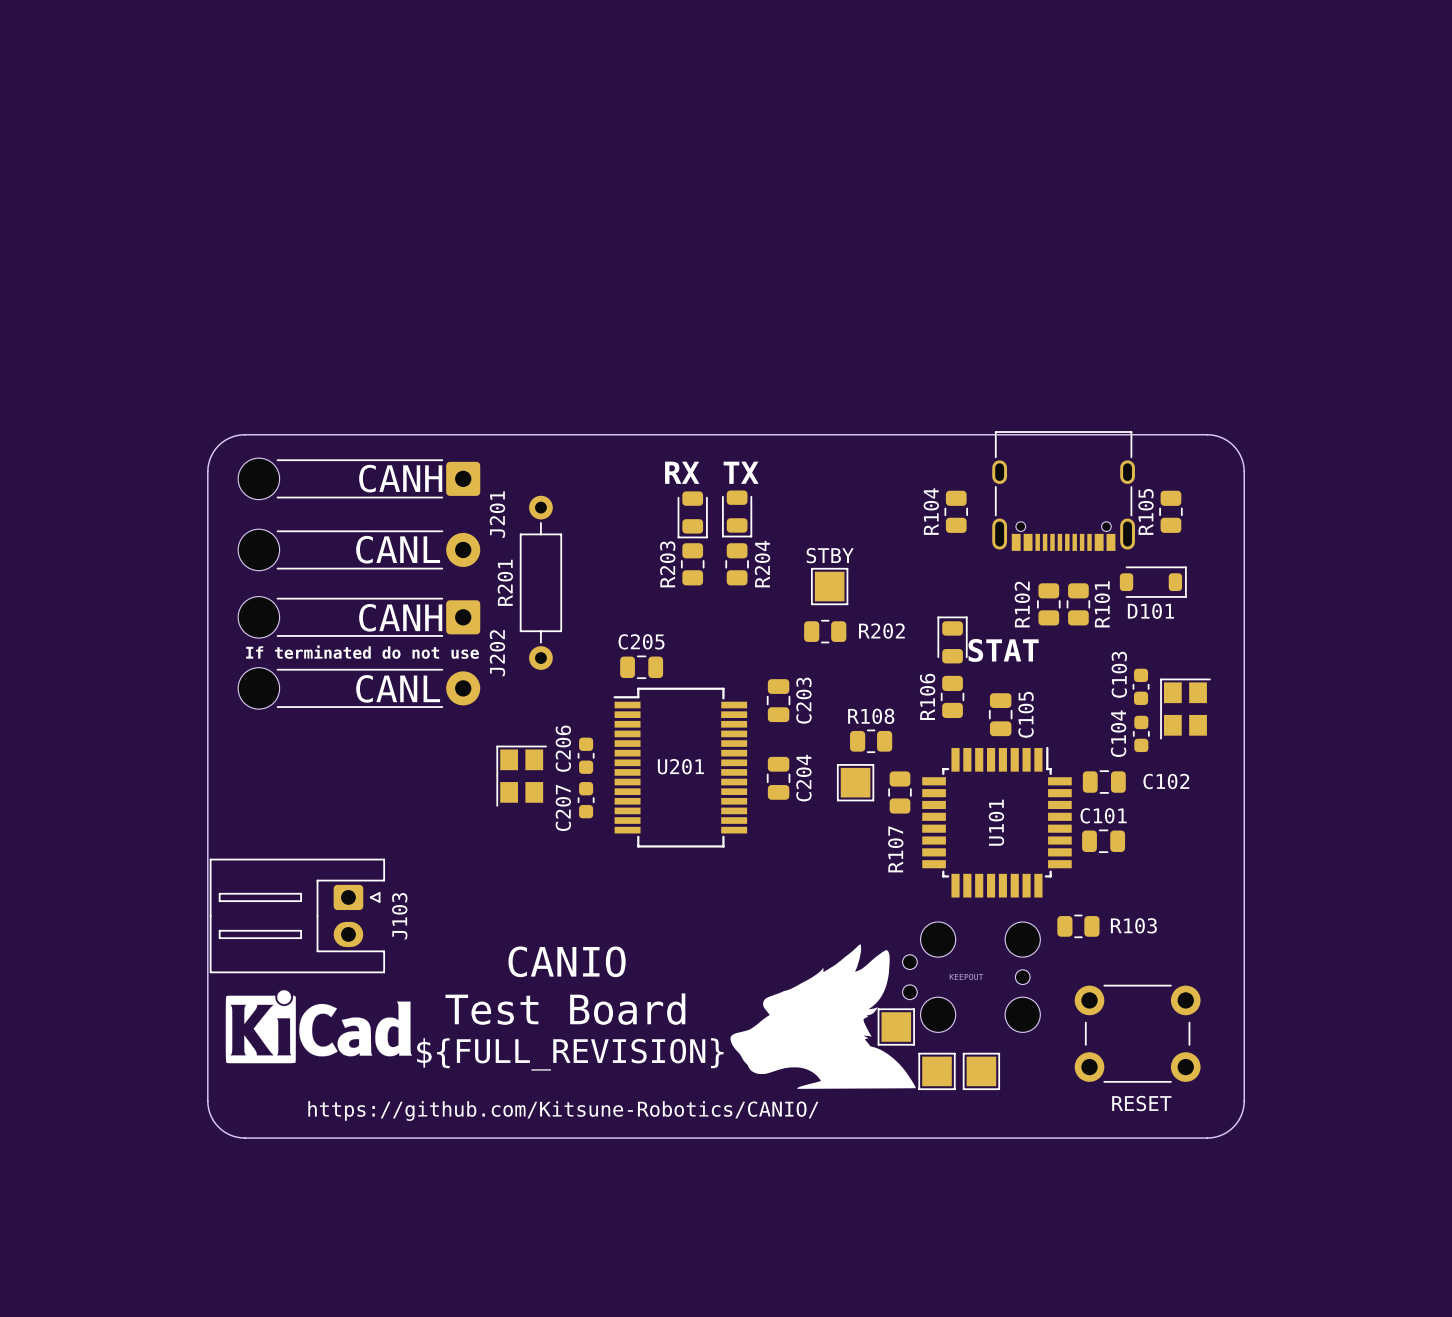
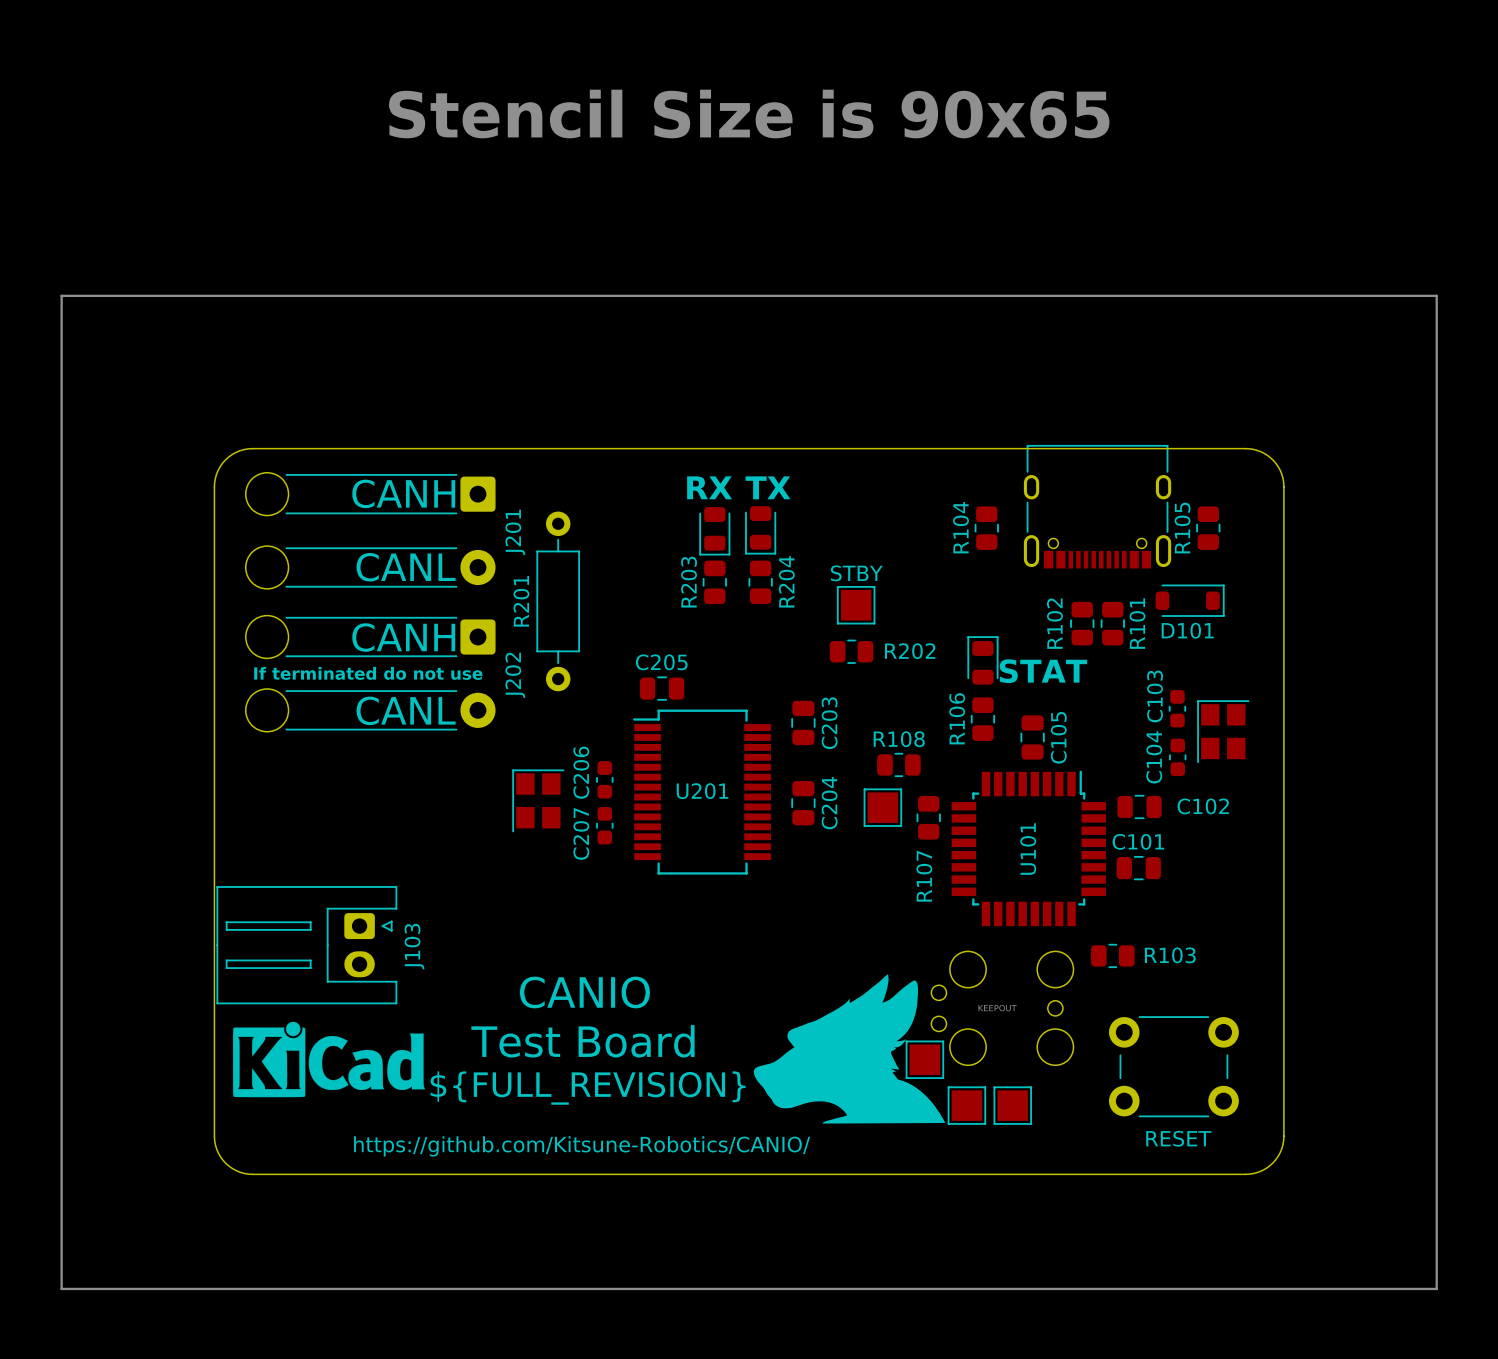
text: none -> Stencil Size is 90x65 (749, 114)
line: none -> (61, 295) (1436, 295) (1436, 1288) (61, 1288) (61, 295)

